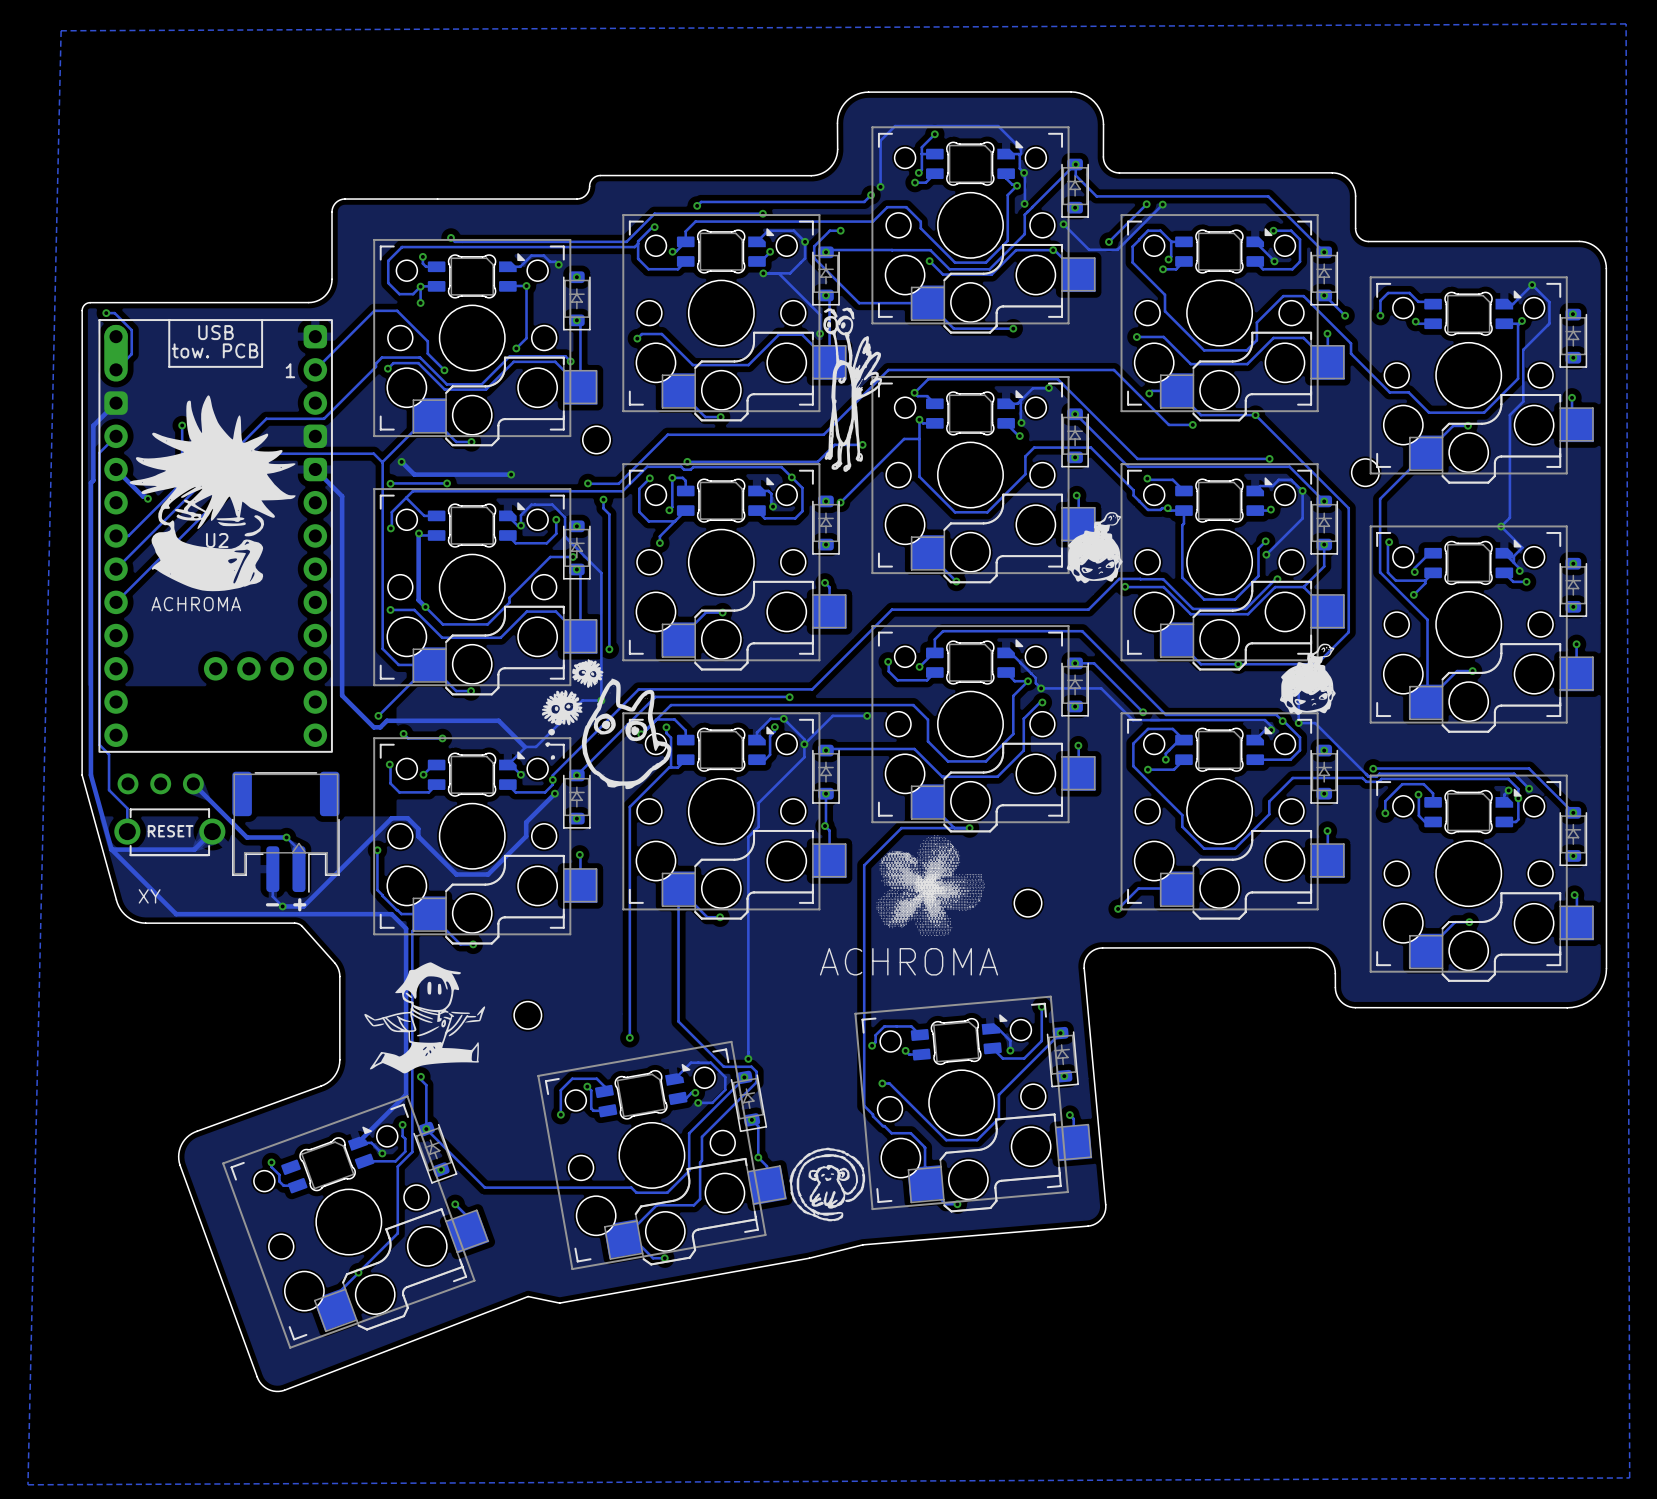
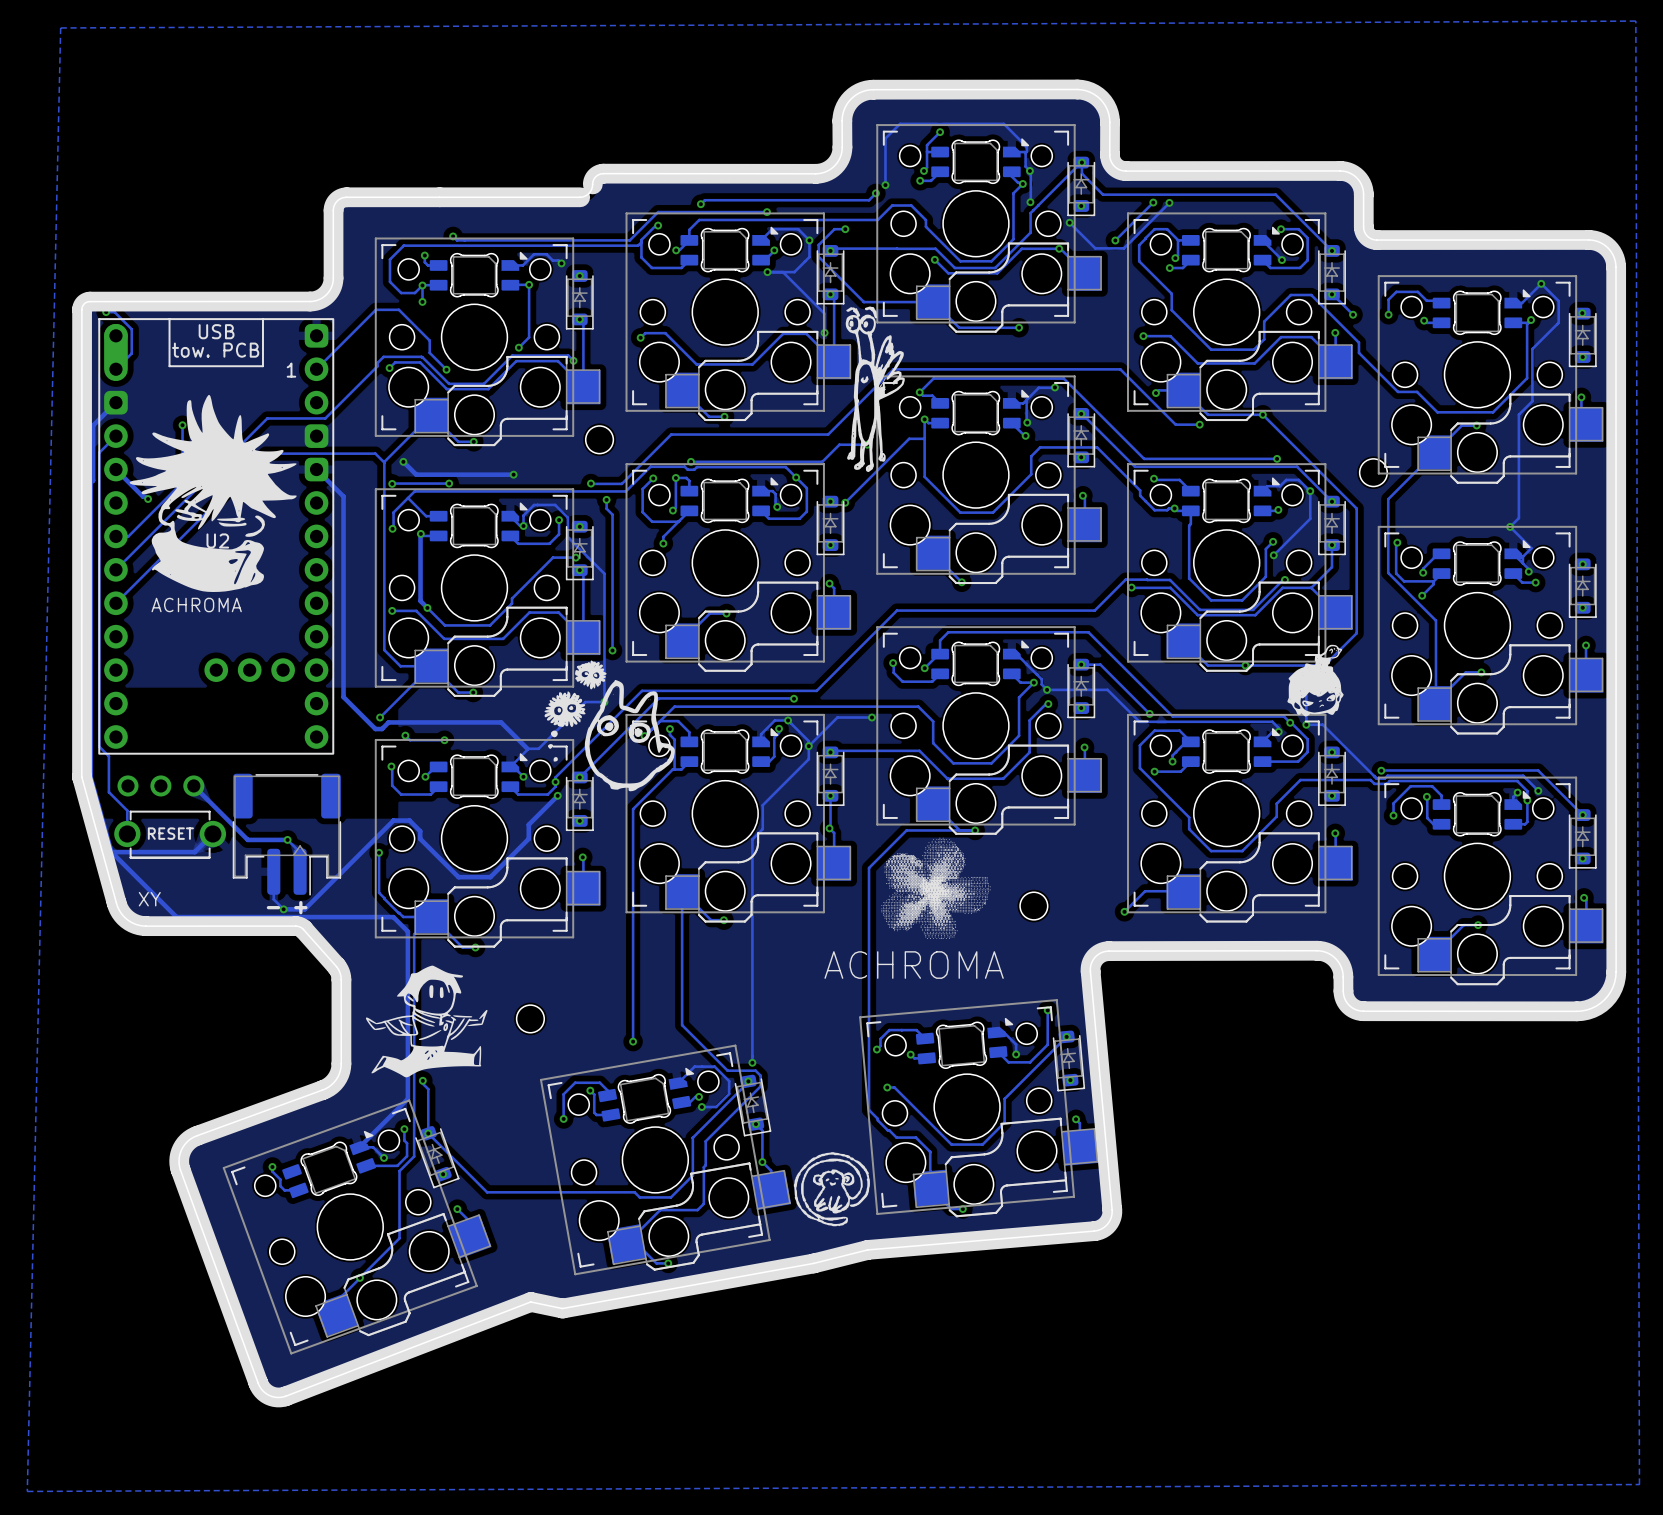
line: none -> (592, 184) (595, 176) (603, 173) (824, 172) (834, 166) (840, 156) (842, 117) (845, 107) (854, 96) (866, 90) (1077, 89) (1093, 93) (1105, 106) (1109, 118) (1110, 158) (1113, 165) (1120, 170) (1343, 171) (1354, 176) (1361, 184) (1363, 191) (1364, 229) (1367, 236) (1374, 239) (1588, 239) (1597, 241) (1605, 245) (1613, 255) (1616, 267) (1616, 971) (1614, 982) (1608, 995) (1596, 1006) (1576, 1011) (1360, 1011) (1351, 1007) (1344, 998) (1343, 974) (1339, 963) (1331, 954) (1322, 951) (1104, 951) (1095, 957) (1090, 969) (1112, 1209) (1109, 1221) (1101, 1228) (1094, 1231) (867, 1249) (813, 1263) (562, 1308) (530, 1301) (285, 1396) (274, 1397) (264, 1392) (258, 1382) (180, 1169) (179, 1157) (185, 1144) (194, 1136) (322, 1090) (333, 1082) (341, 1067) (341, 977) (336, 966) (299, 926) (142, 925) (127, 919) (117, 905) (82, 777) (82, 307) (85, 303) (90, 301) (310, 301) (320, 299) (328, 292) (332, 283) (333, 208) (336, 202) (343, 197) (580, 197)
drawing position: (852, 389) -> (875, 389)
drawing: [1066, 512, 1123, 584] -> none

